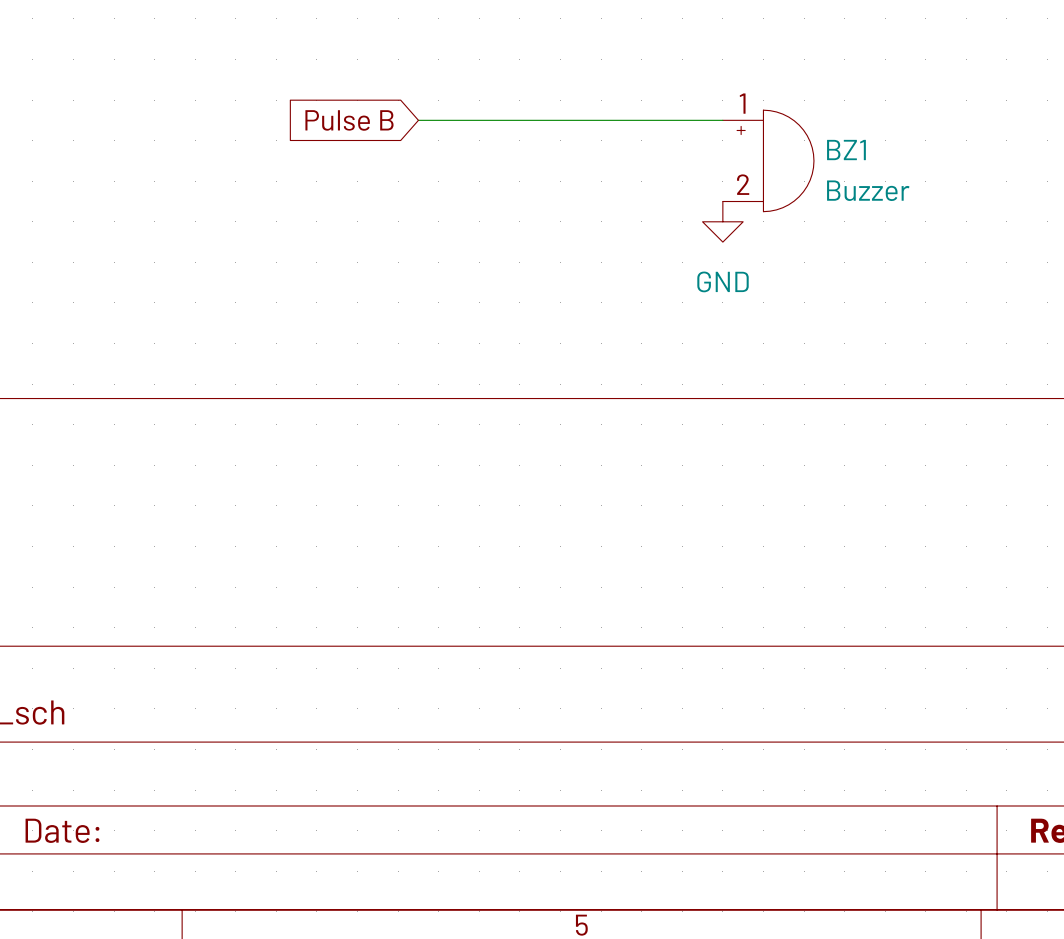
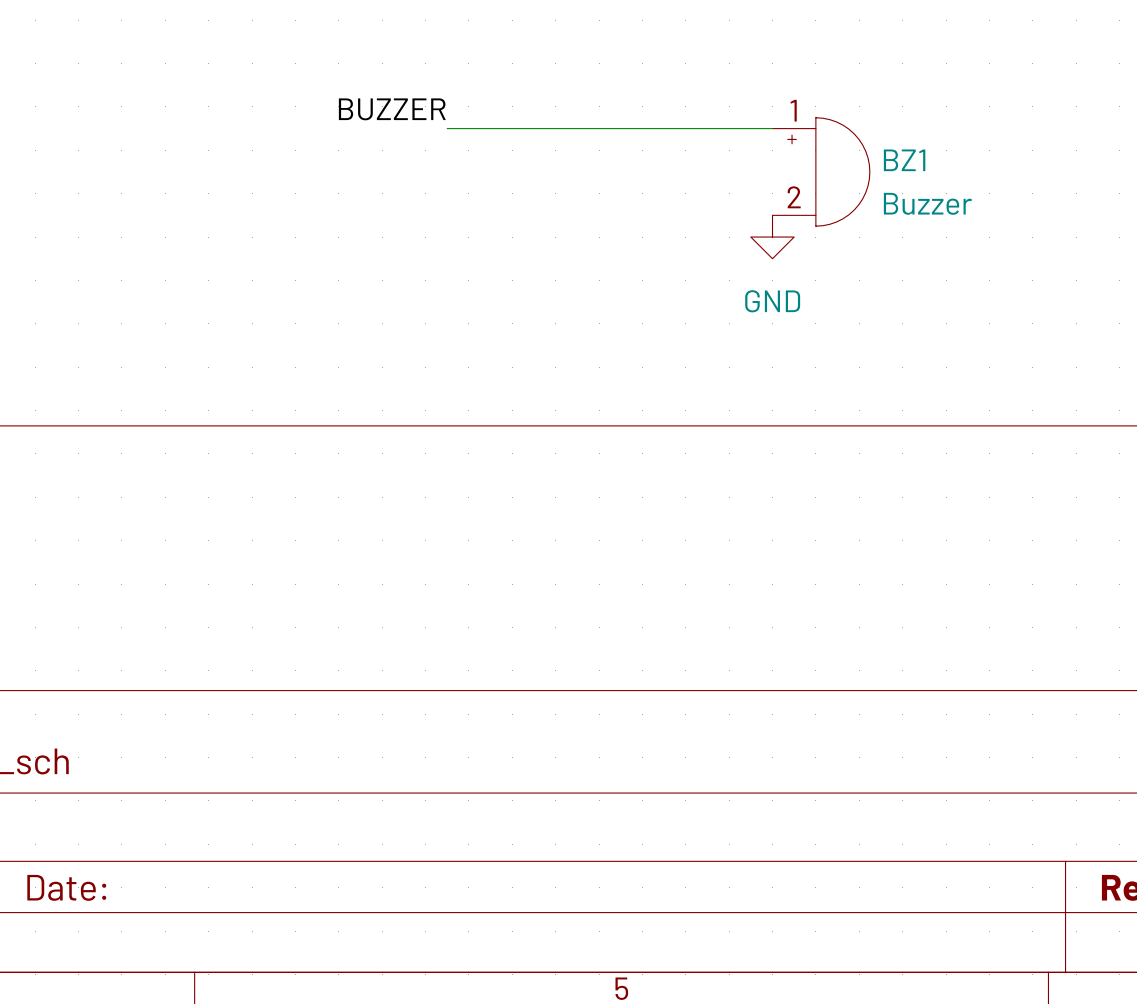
label: none -> BUZZER (392, 109)
global label: Pulse B (349, 120) -> none

